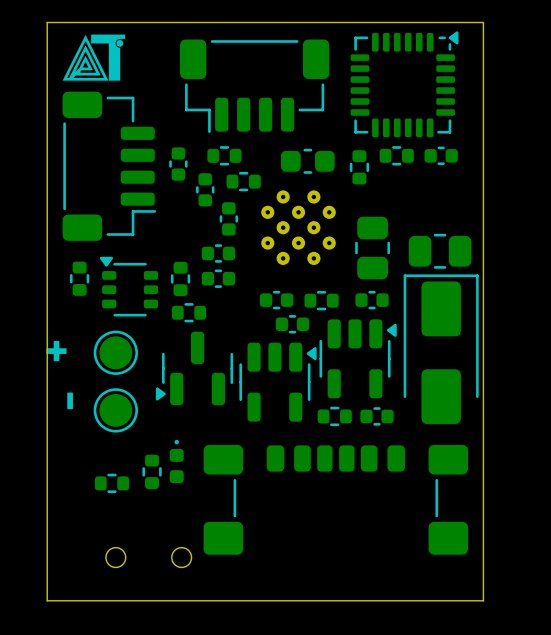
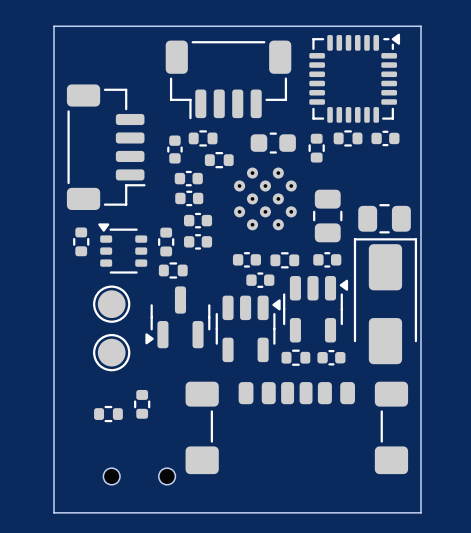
drawing: [62, 34, 126, 81] -> none
part: (178, 164) -> none
part: none -> (174, 149)
part: (205, 189) -> none
part: none -> (188, 178)
part: (228, 218) -> none
part: none -> (189, 198)
text: + (56, 351) -> none
text: - (70, 400) -> none
part: (176, 461) -> none

